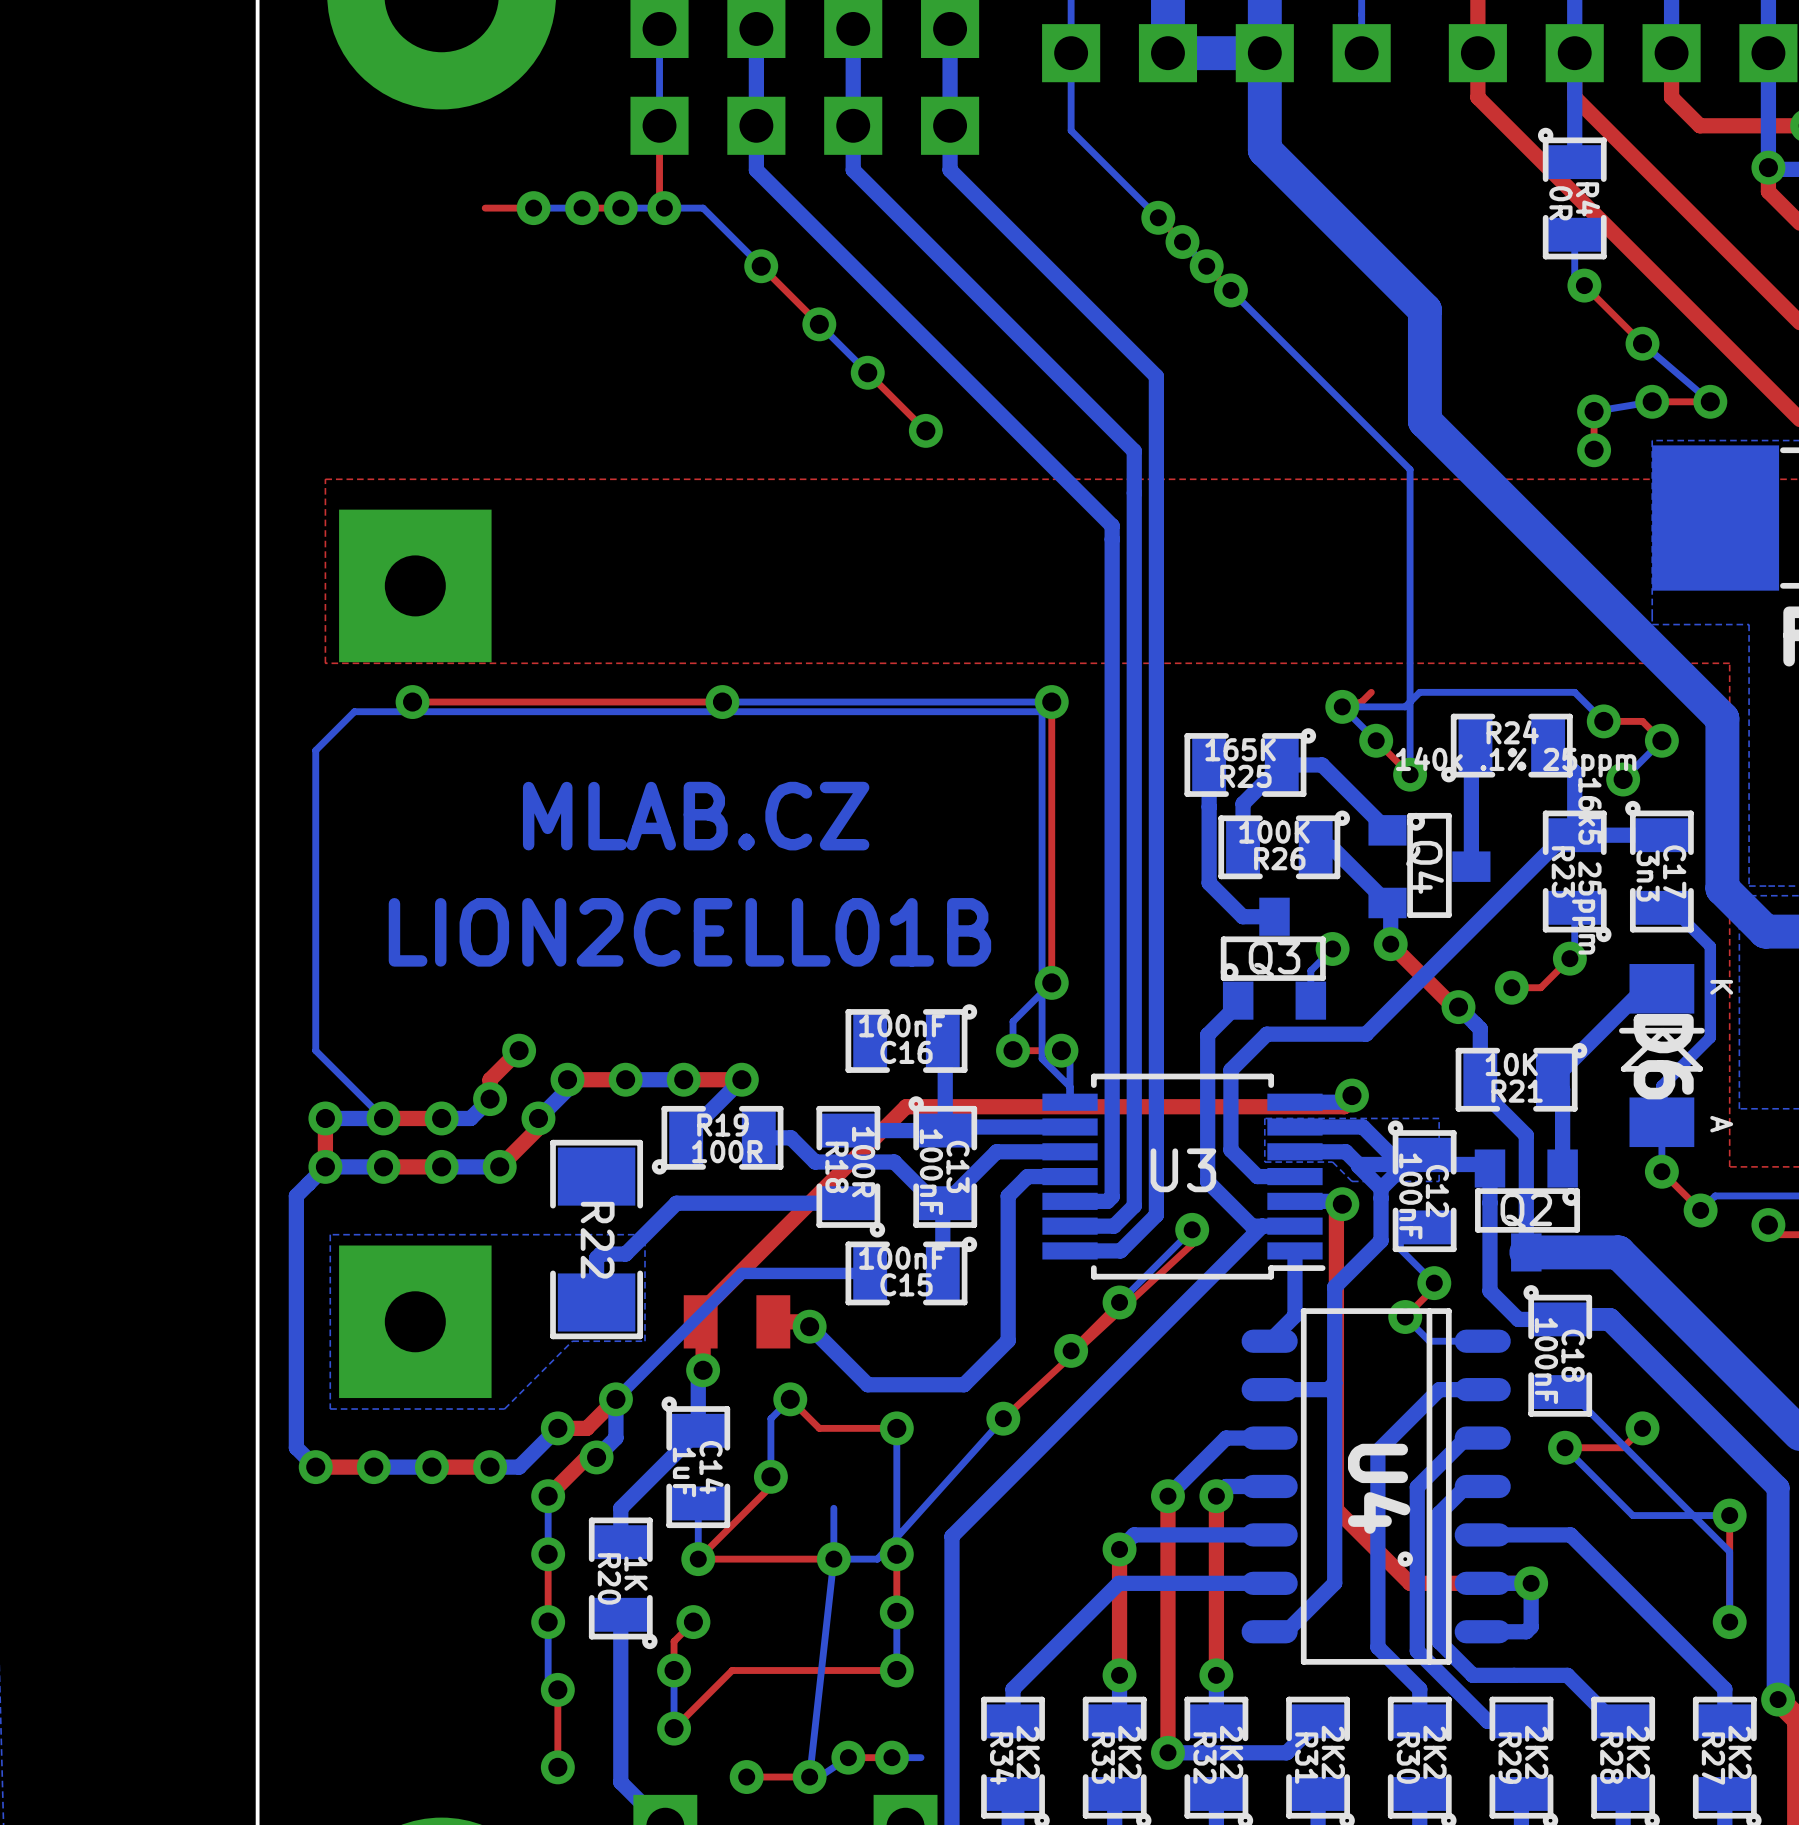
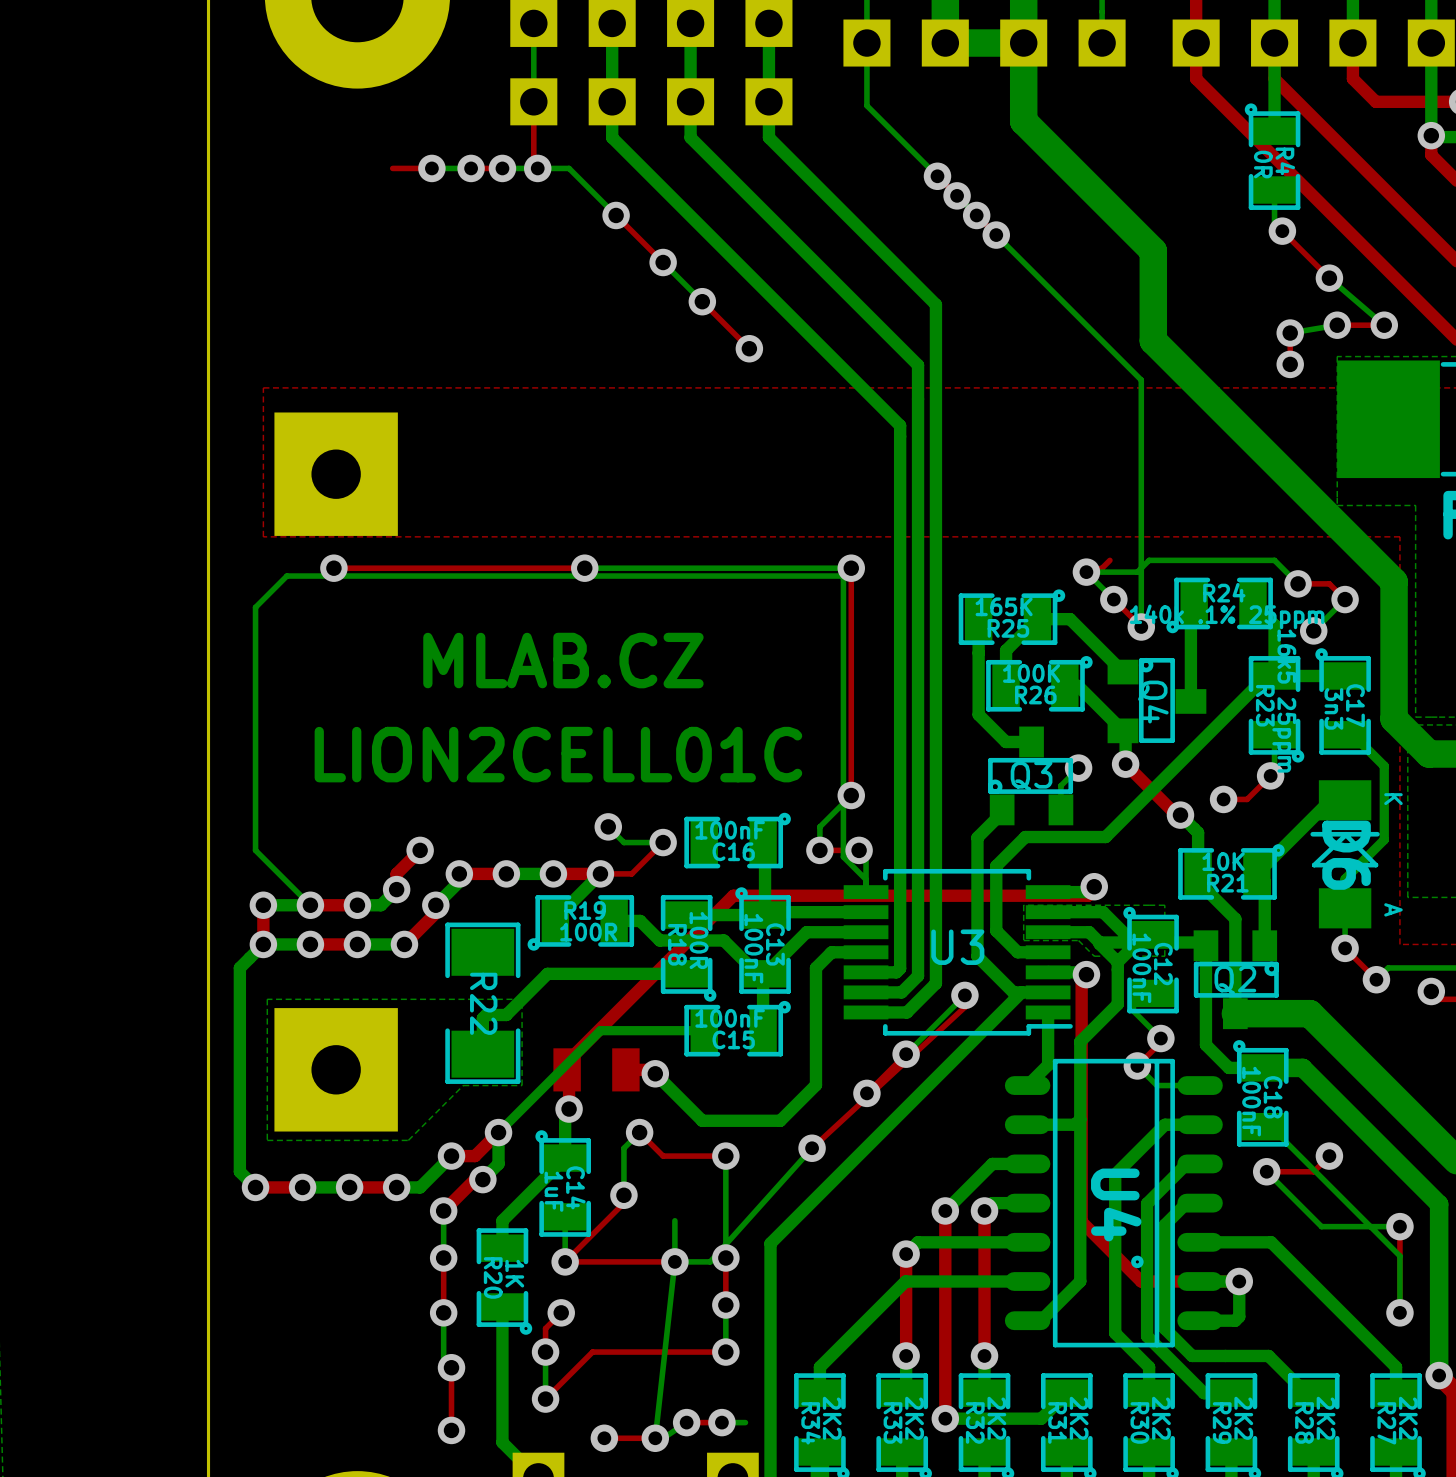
text: LION2CELL01B (689, 932) -> LION2CELL01C (558, 754)
bottom track: none -> (608, 826) (623, 842) (663, 842)
via: none -> (608, 826)
top track: none -> (663, 842) (631, 873) (600, 873)
via: none -> (663, 842)

